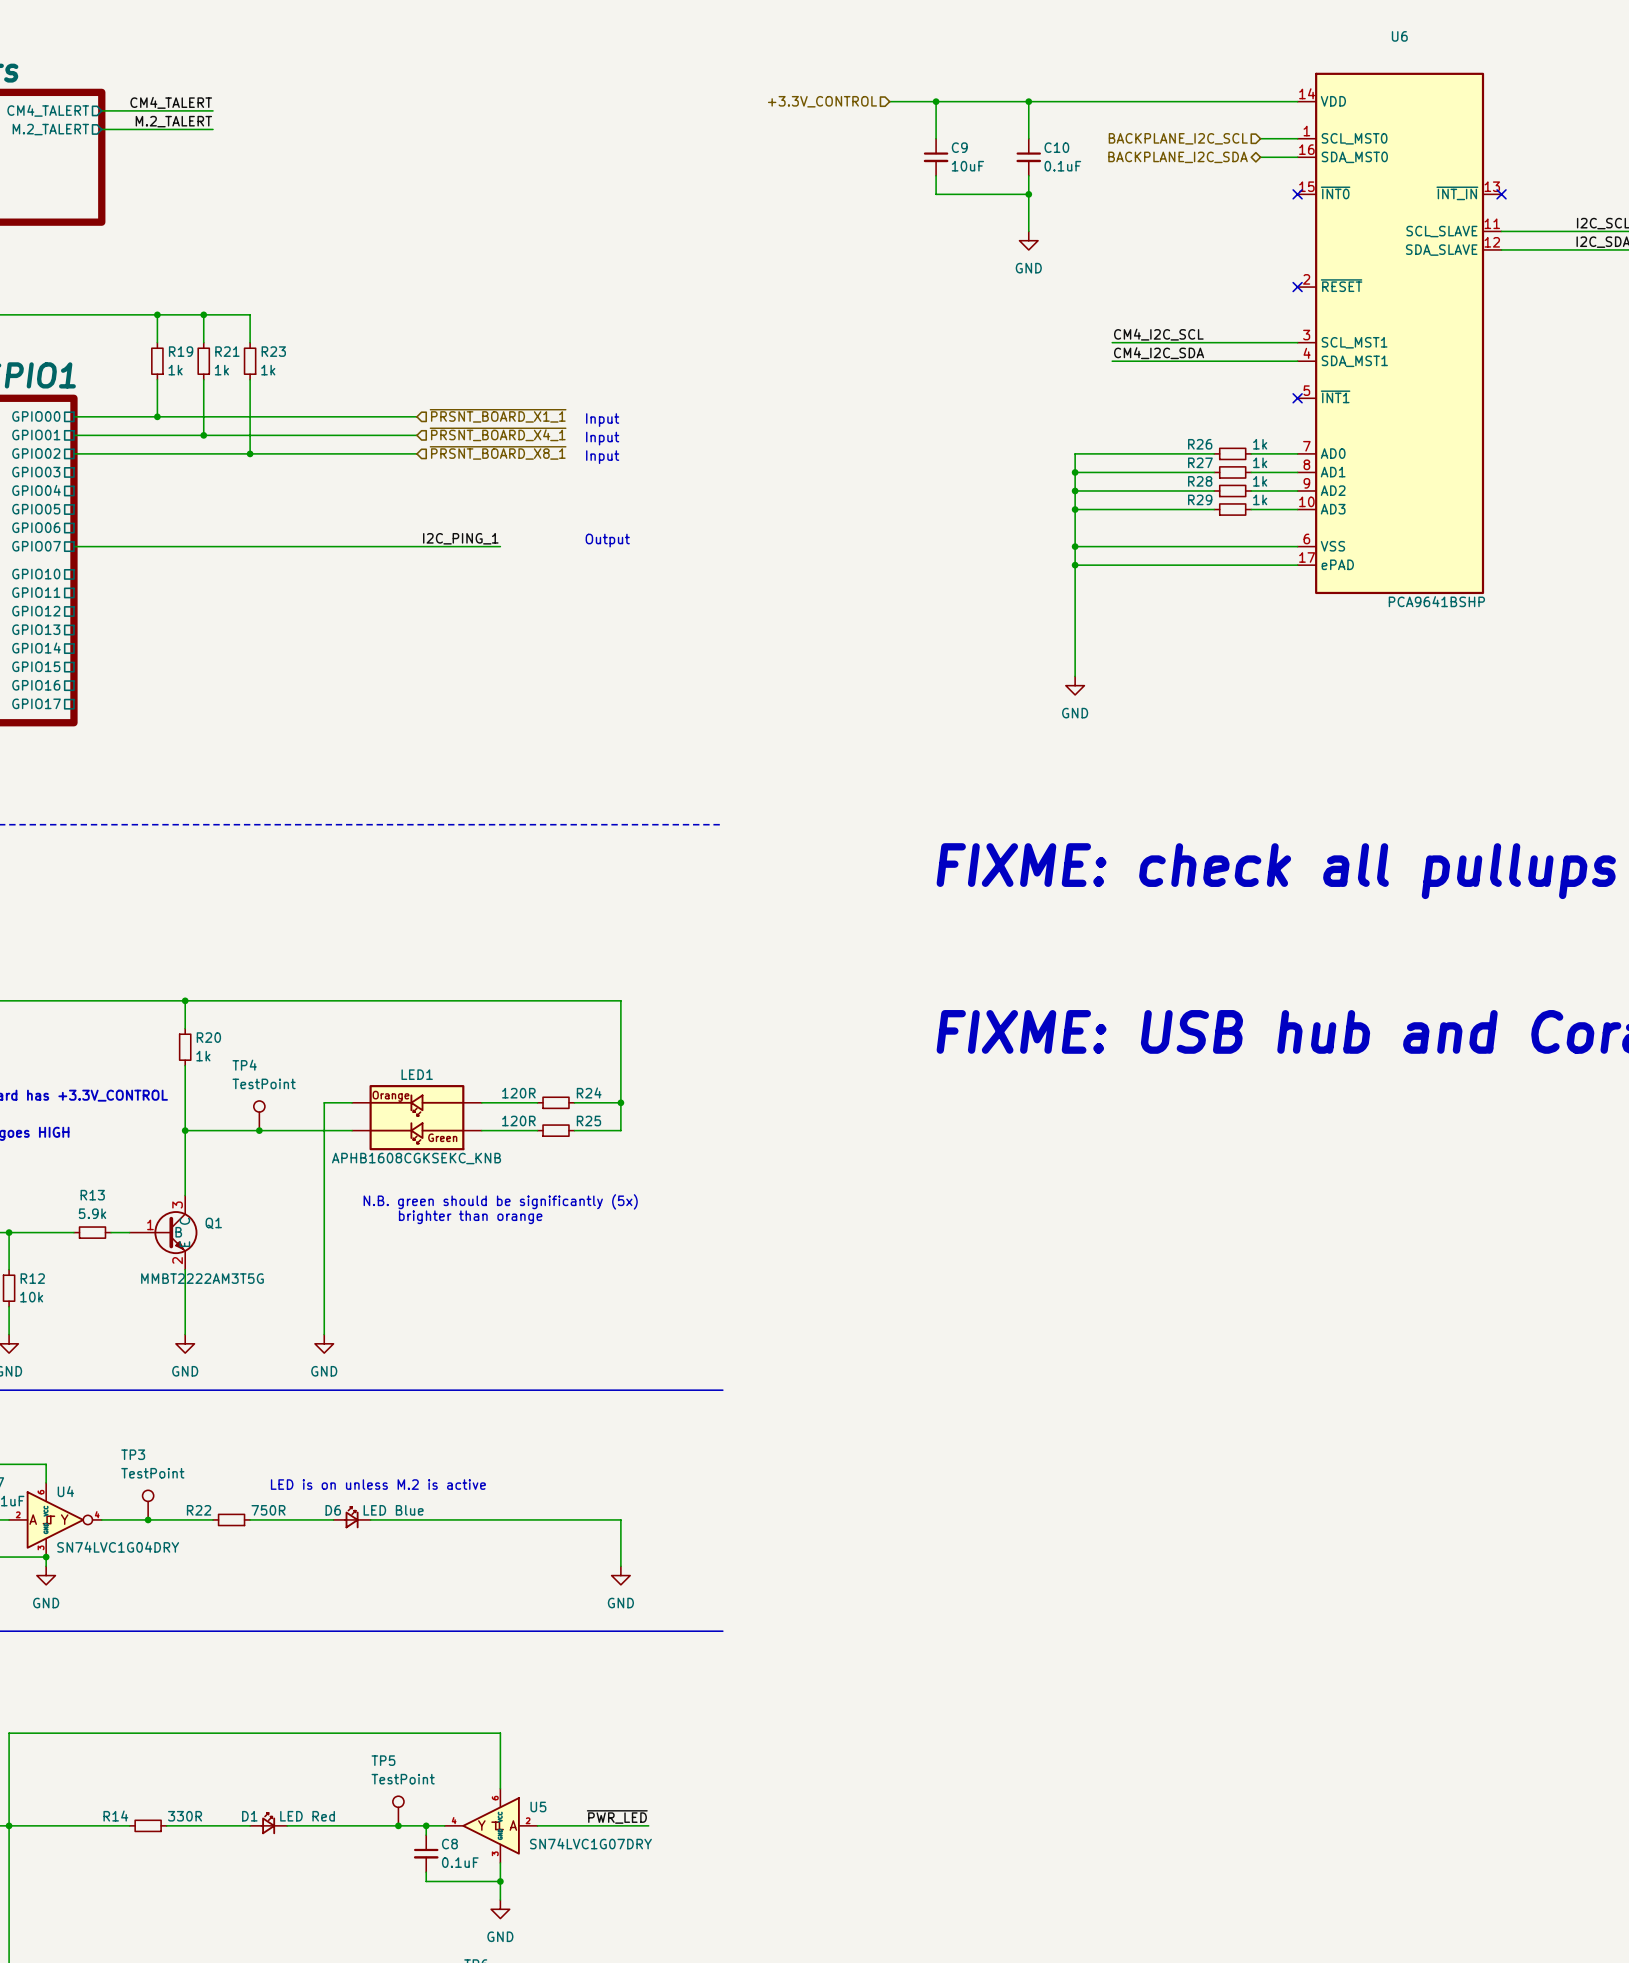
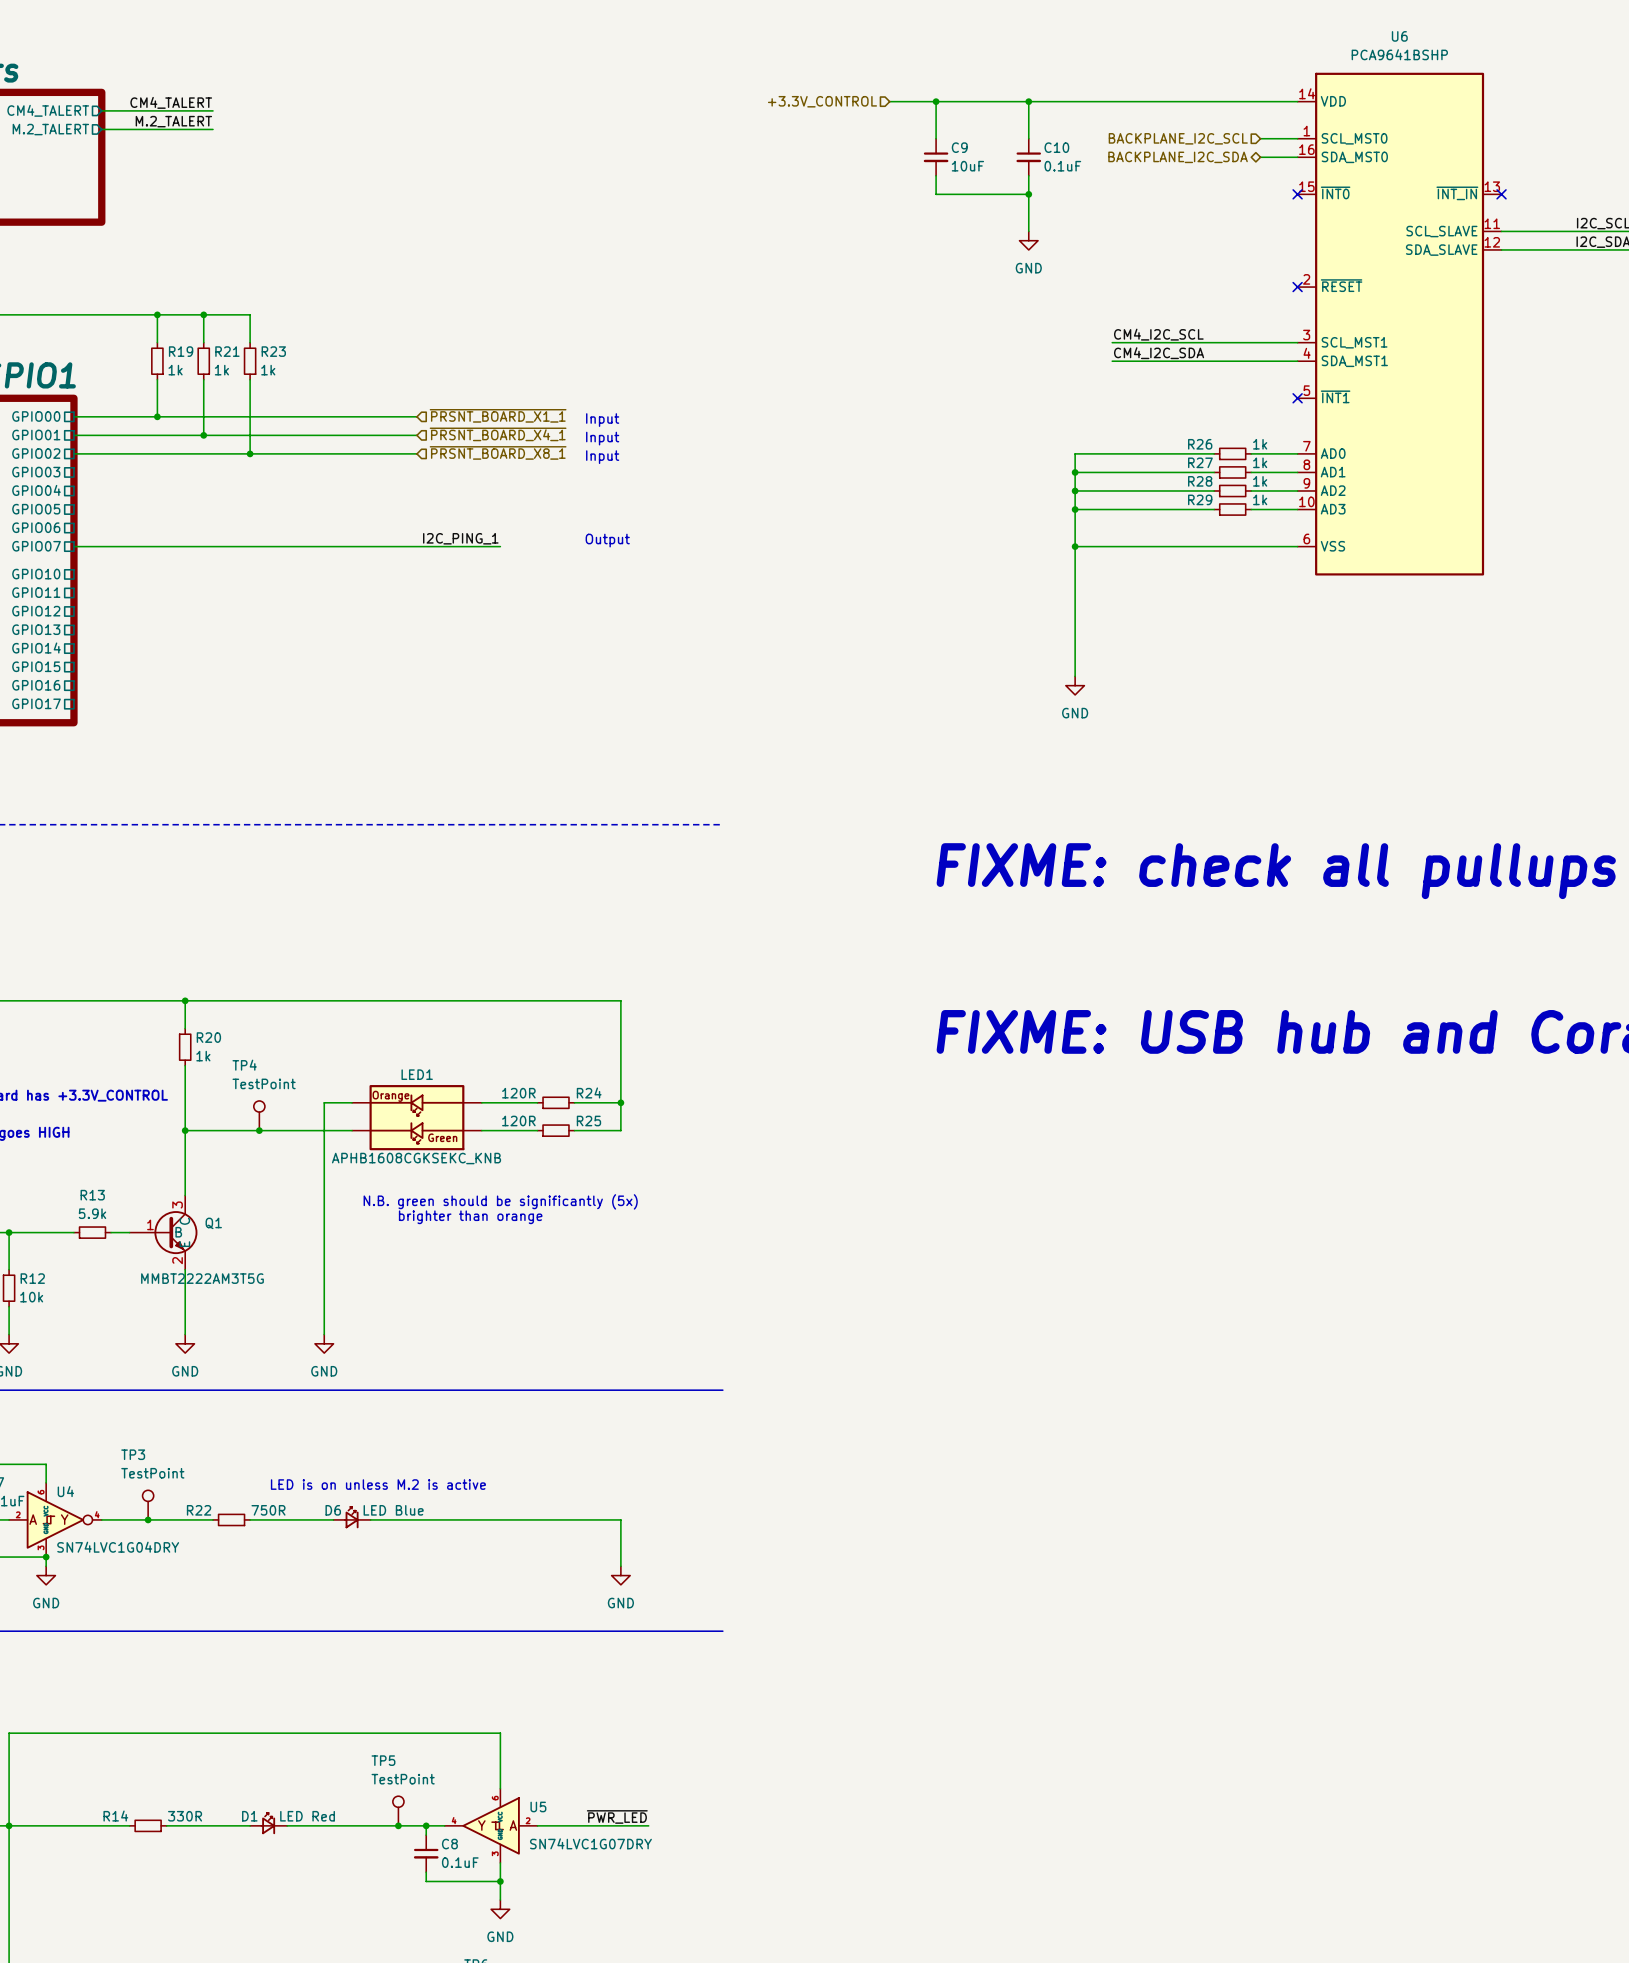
U6 symbol: [1297, 72, 1502, 595] -> [1297, 72, 1502, 576]
wire: (1075, 565) (1297, 565) -> none
junction: (1075, 565) -> none
U6 value position: PCA9641BSHP (1436, 601) -> PCA9641BSHP (1399, 54)

